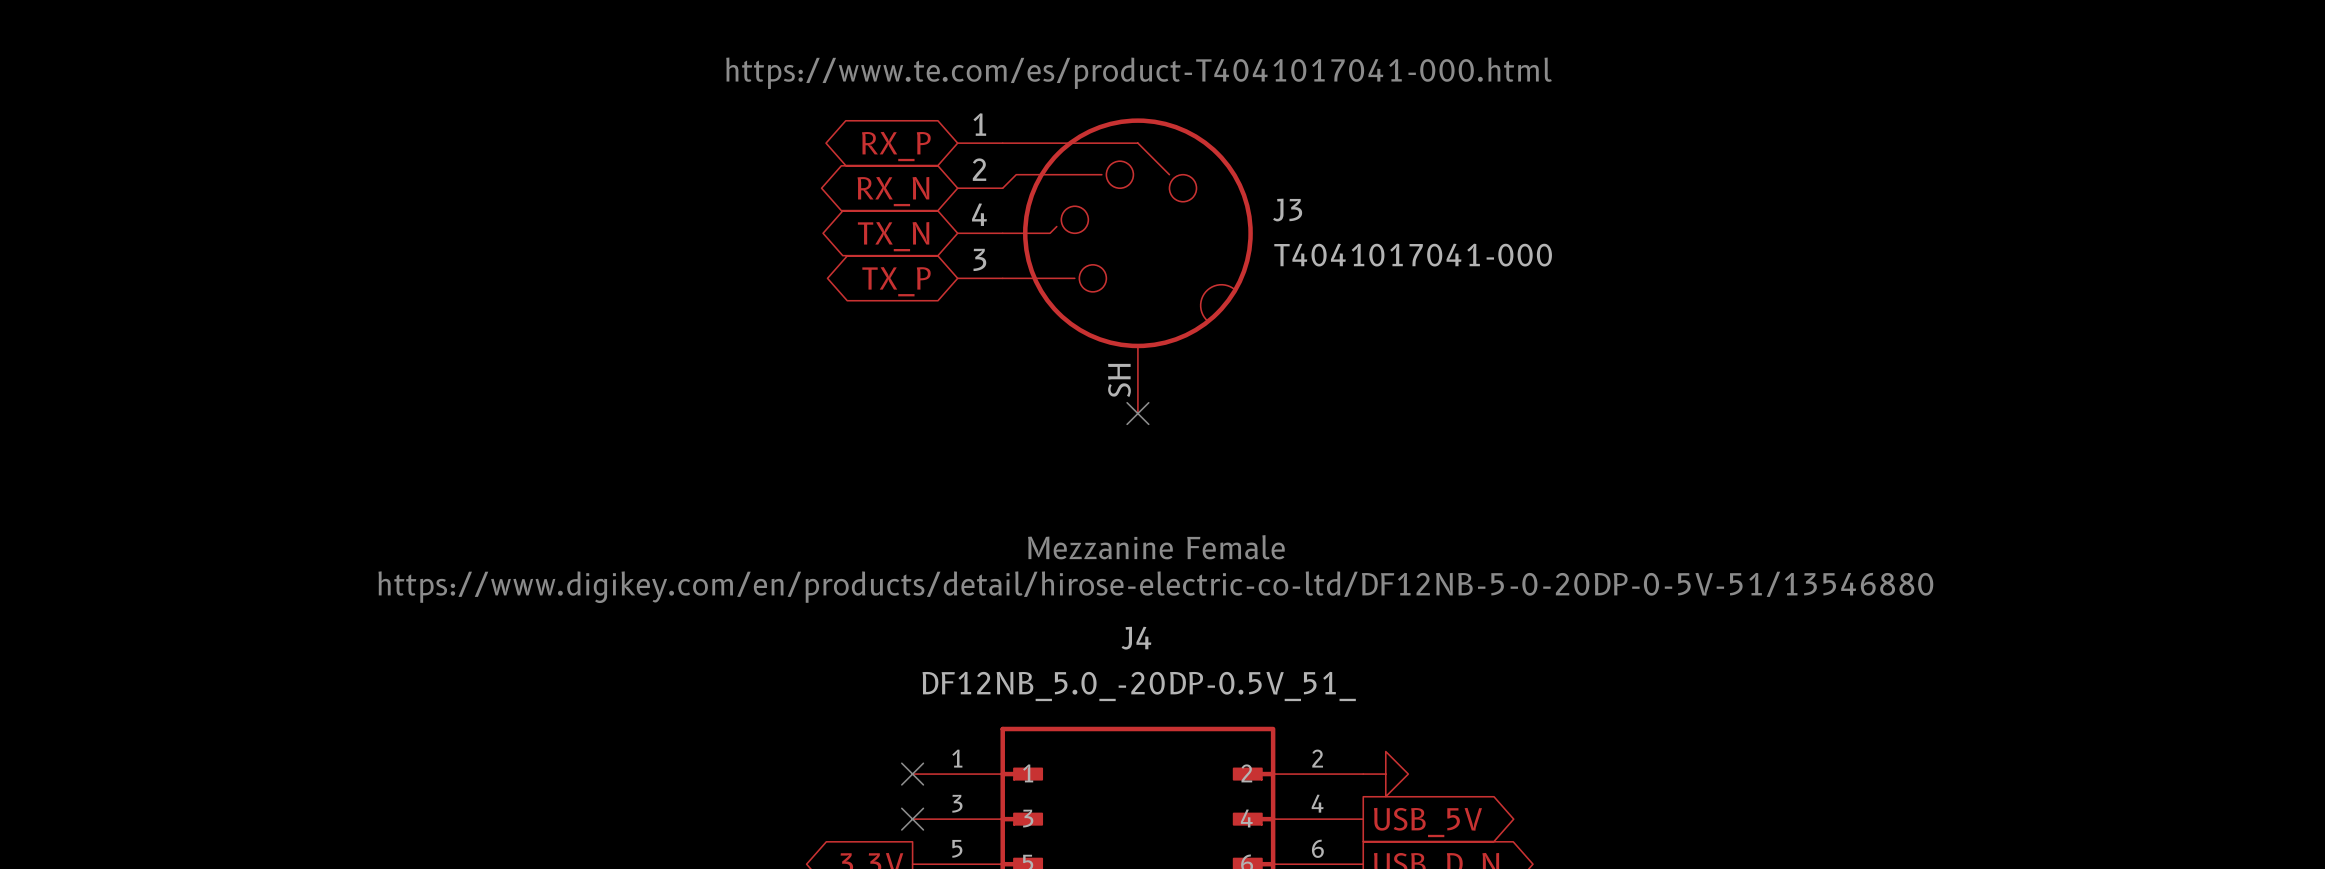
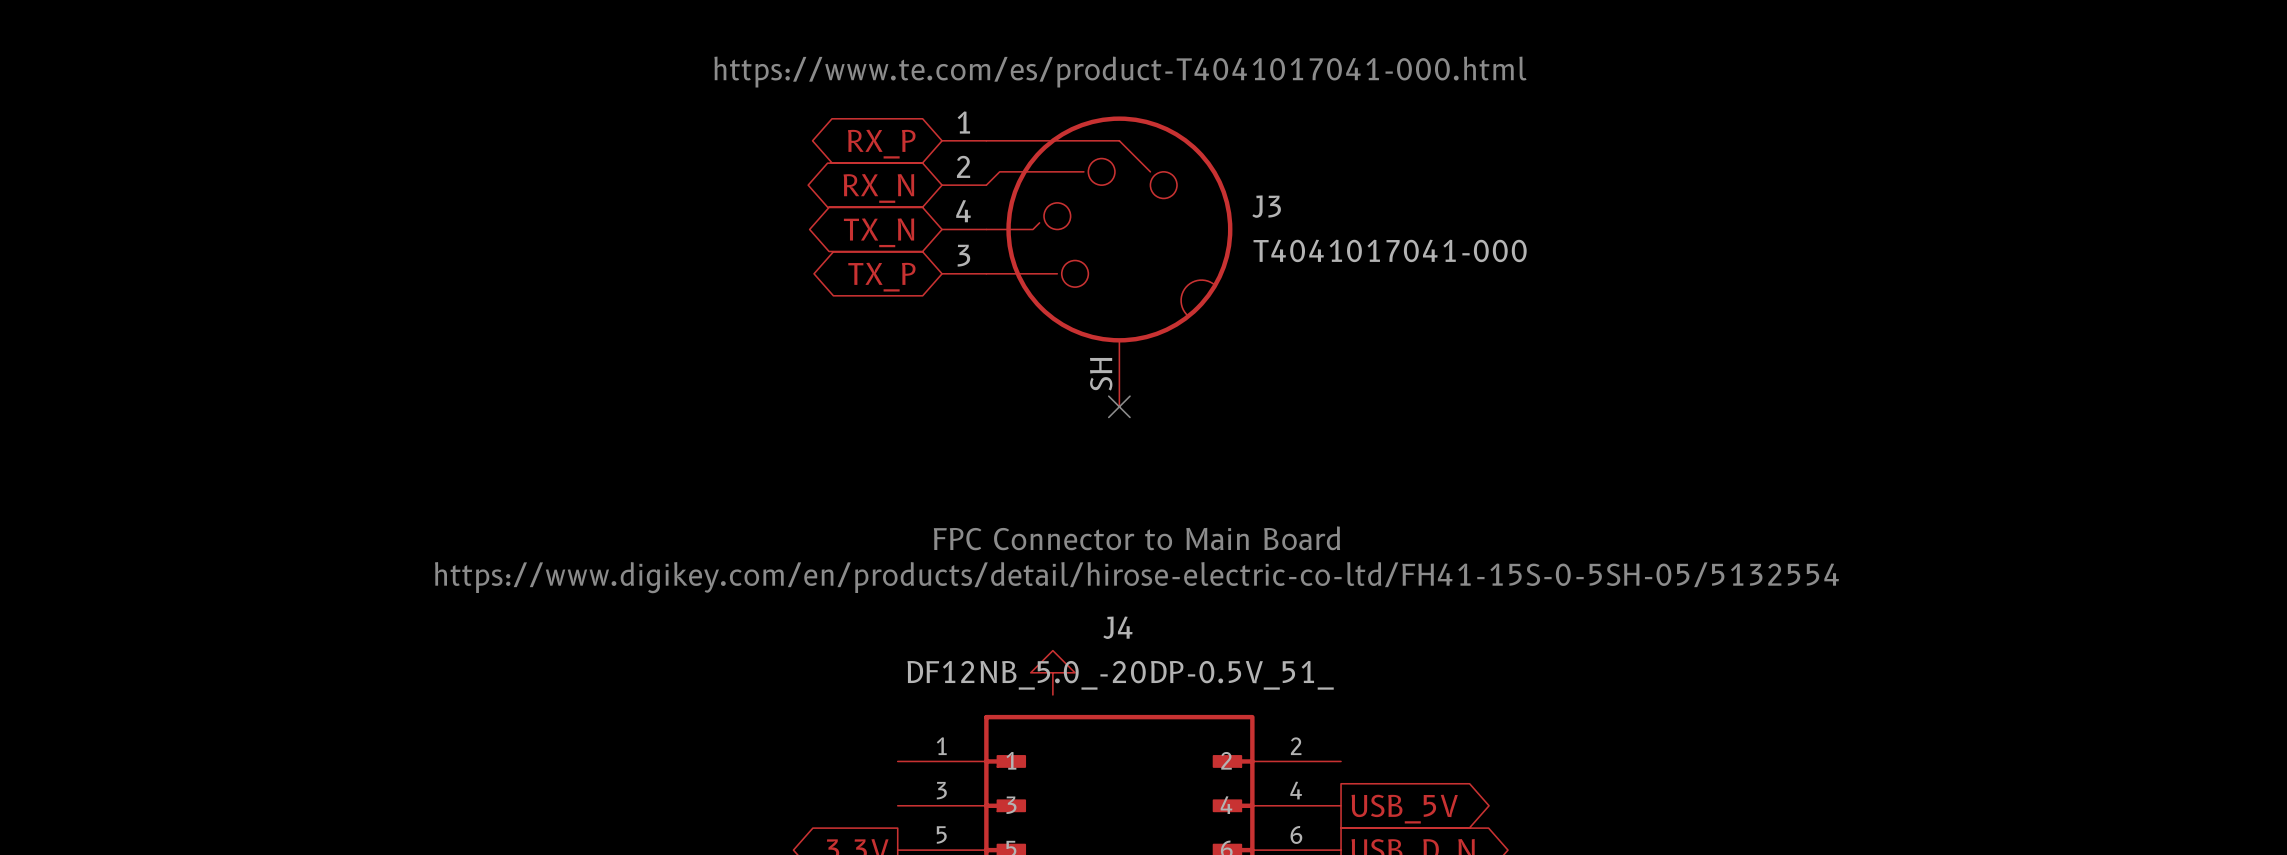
text: Mezzanine Female (1156, 547) -> FPC Connector to Main Board (1136, 538)
text: https://www.digikey.com/en/products/detail/hirose-electric-co-ltd/DF12NB-5-0-20DP-0-5V-51/13546880 (1155, 587) -> https://www.digikey.com/en/products/detail/hirose-electric-co-ltd/FH41-15S-0-5SH-05/5132554 (1136, 577)
power symbol: none -> (1052, 672)
no-connect mark: (912, 774) -> none
power symbol: (1385, 774) -> none
no-connect mark: (912, 819) -> none

